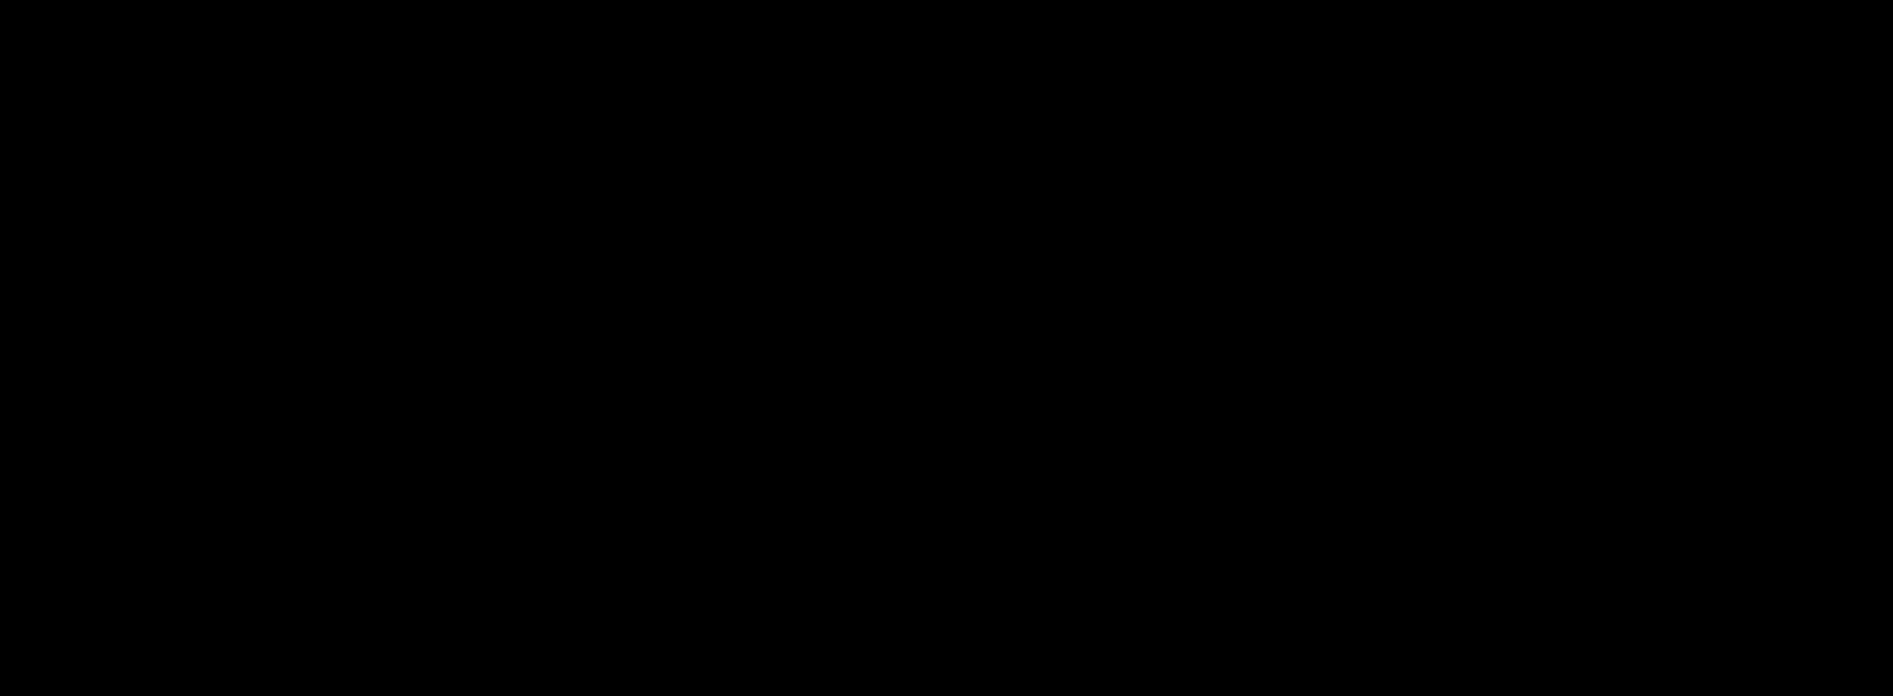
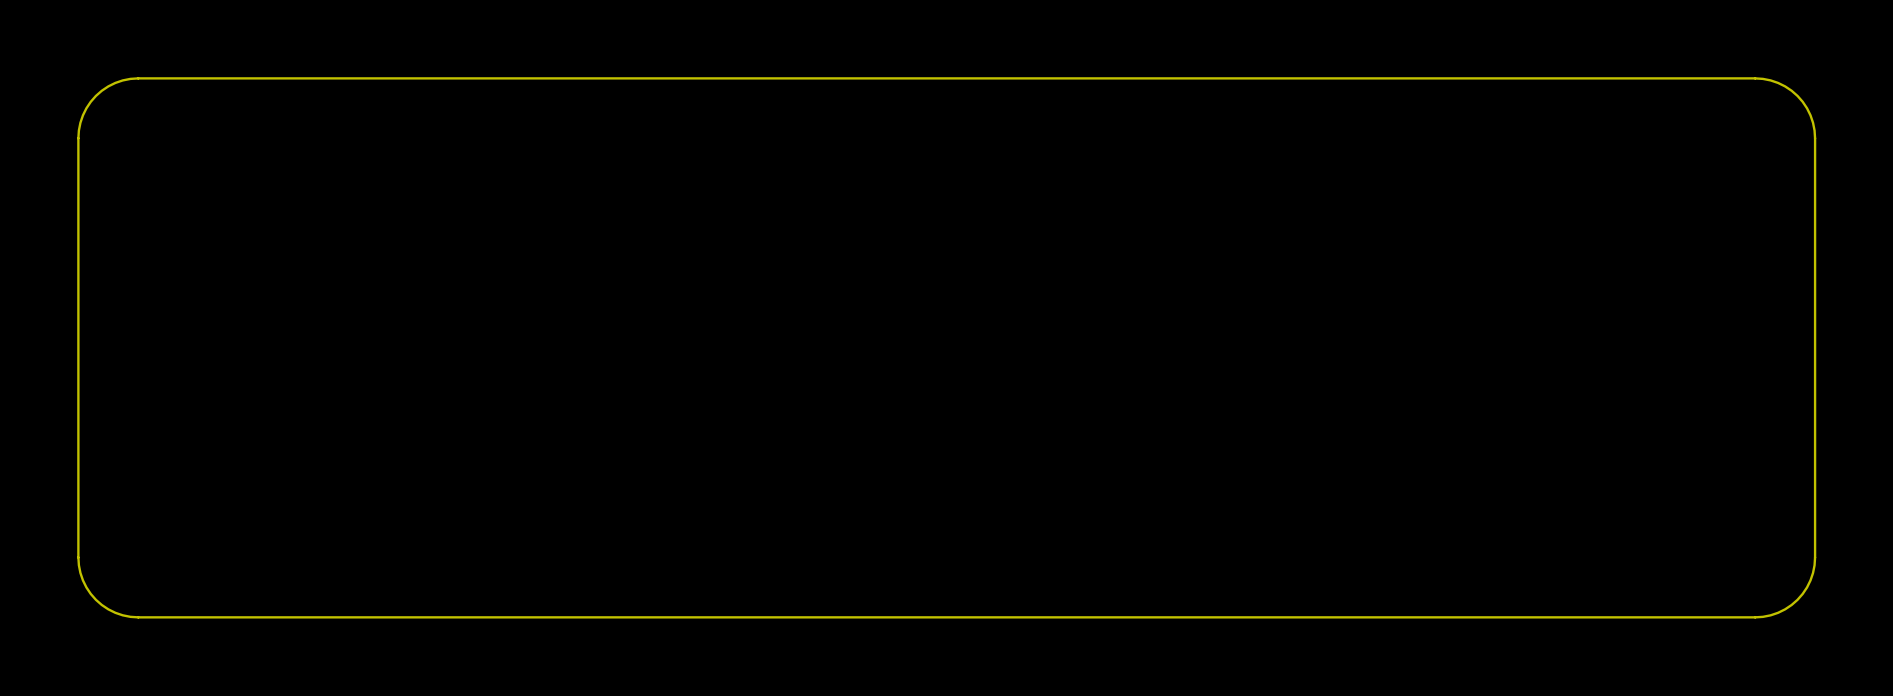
board edge: none -> (1755, 78) (138, 78) (122, 80) (108, 86) (95, 95) (82, 115) (78, 130) (78, 557) (80, 572) (86, 587) (101, 604) (115, 612) (138, 617) (1755, 617) (1770, 615) (1791, 604) (1802, 593) (1810, 580) (1814, 565) (1815, 138) (1810, 115) (1797, 95) (1778, 82) (1755, 78)

